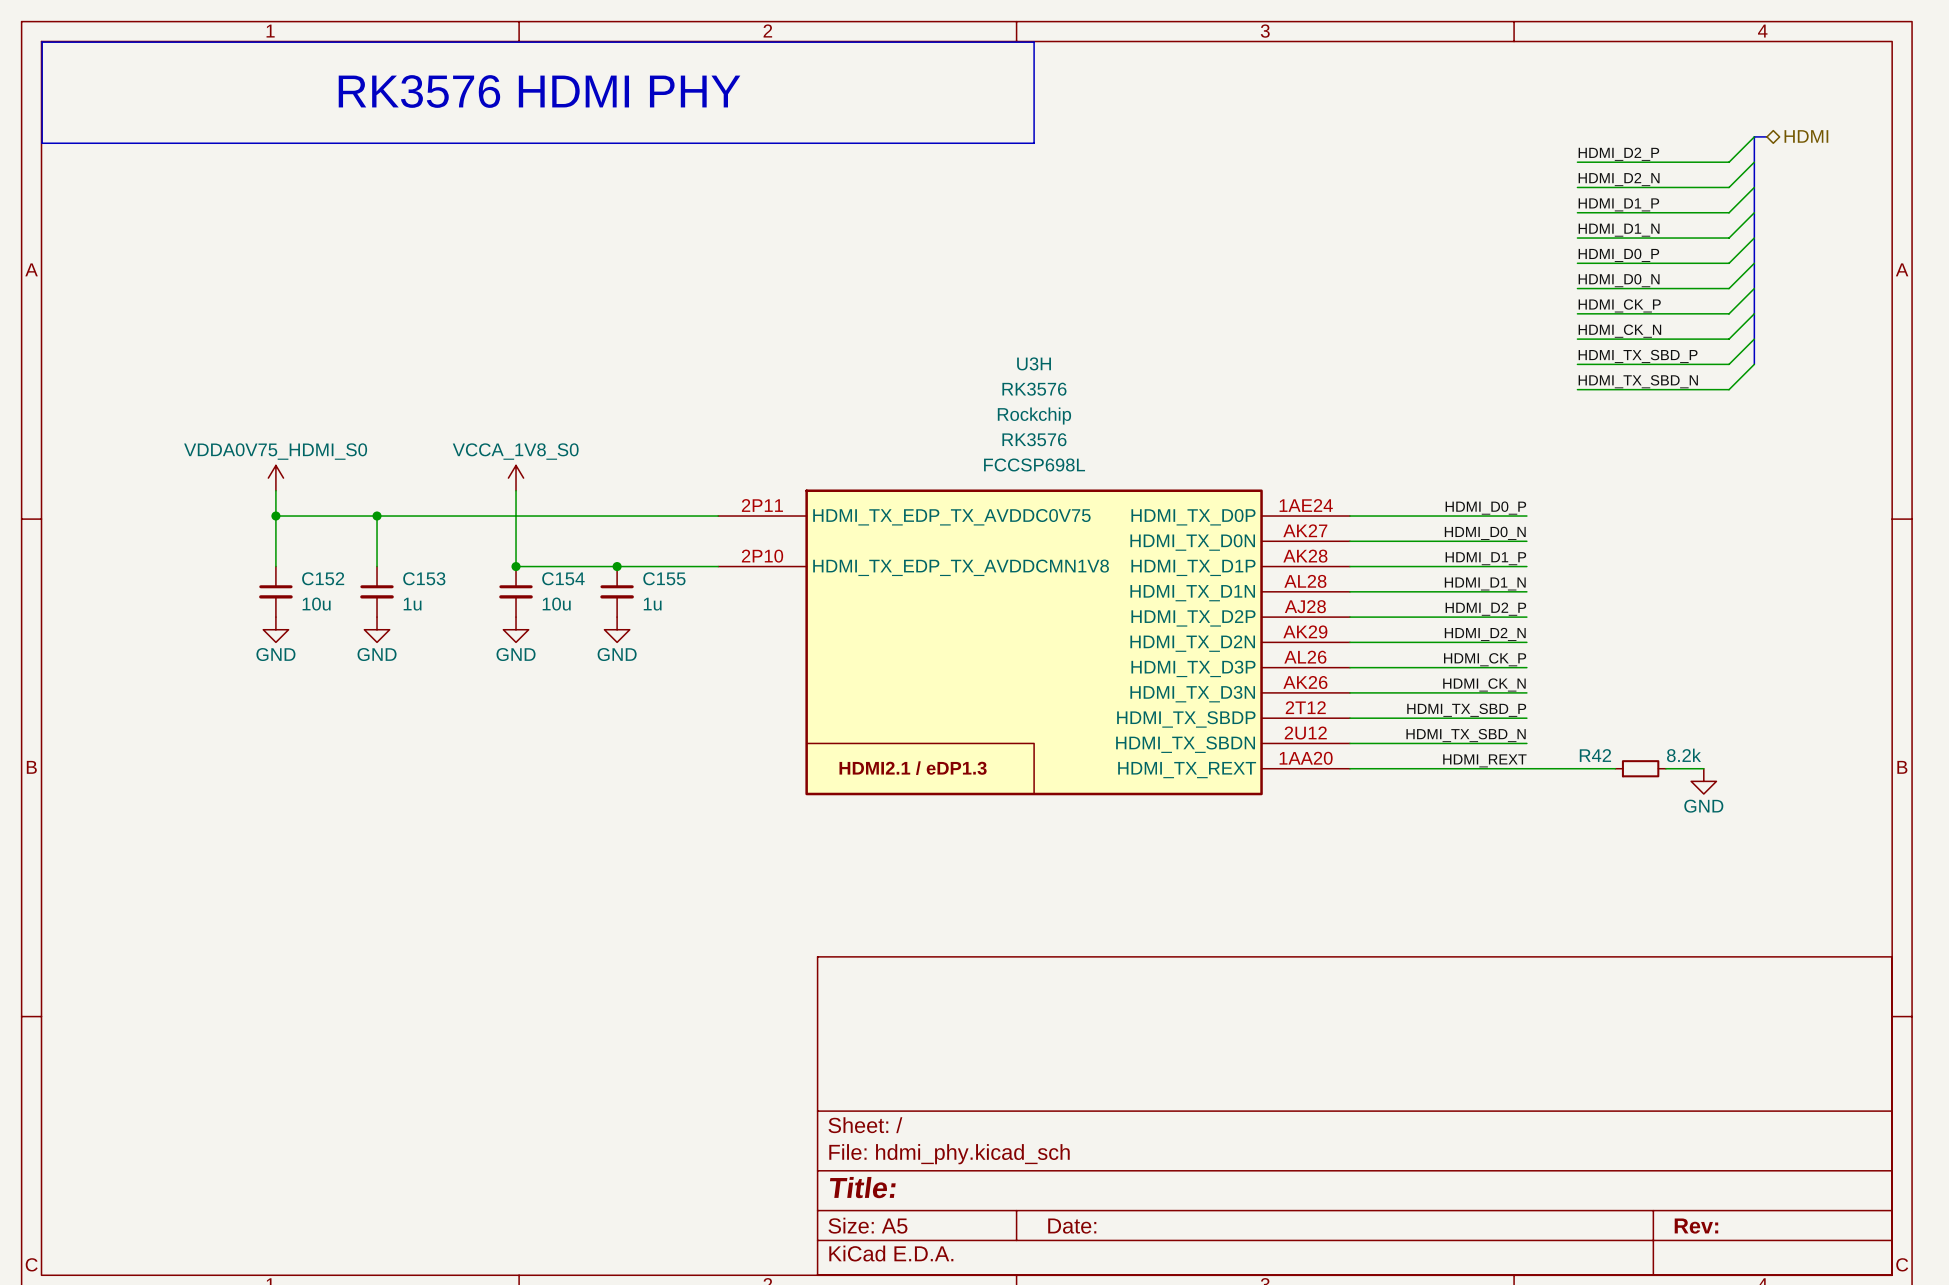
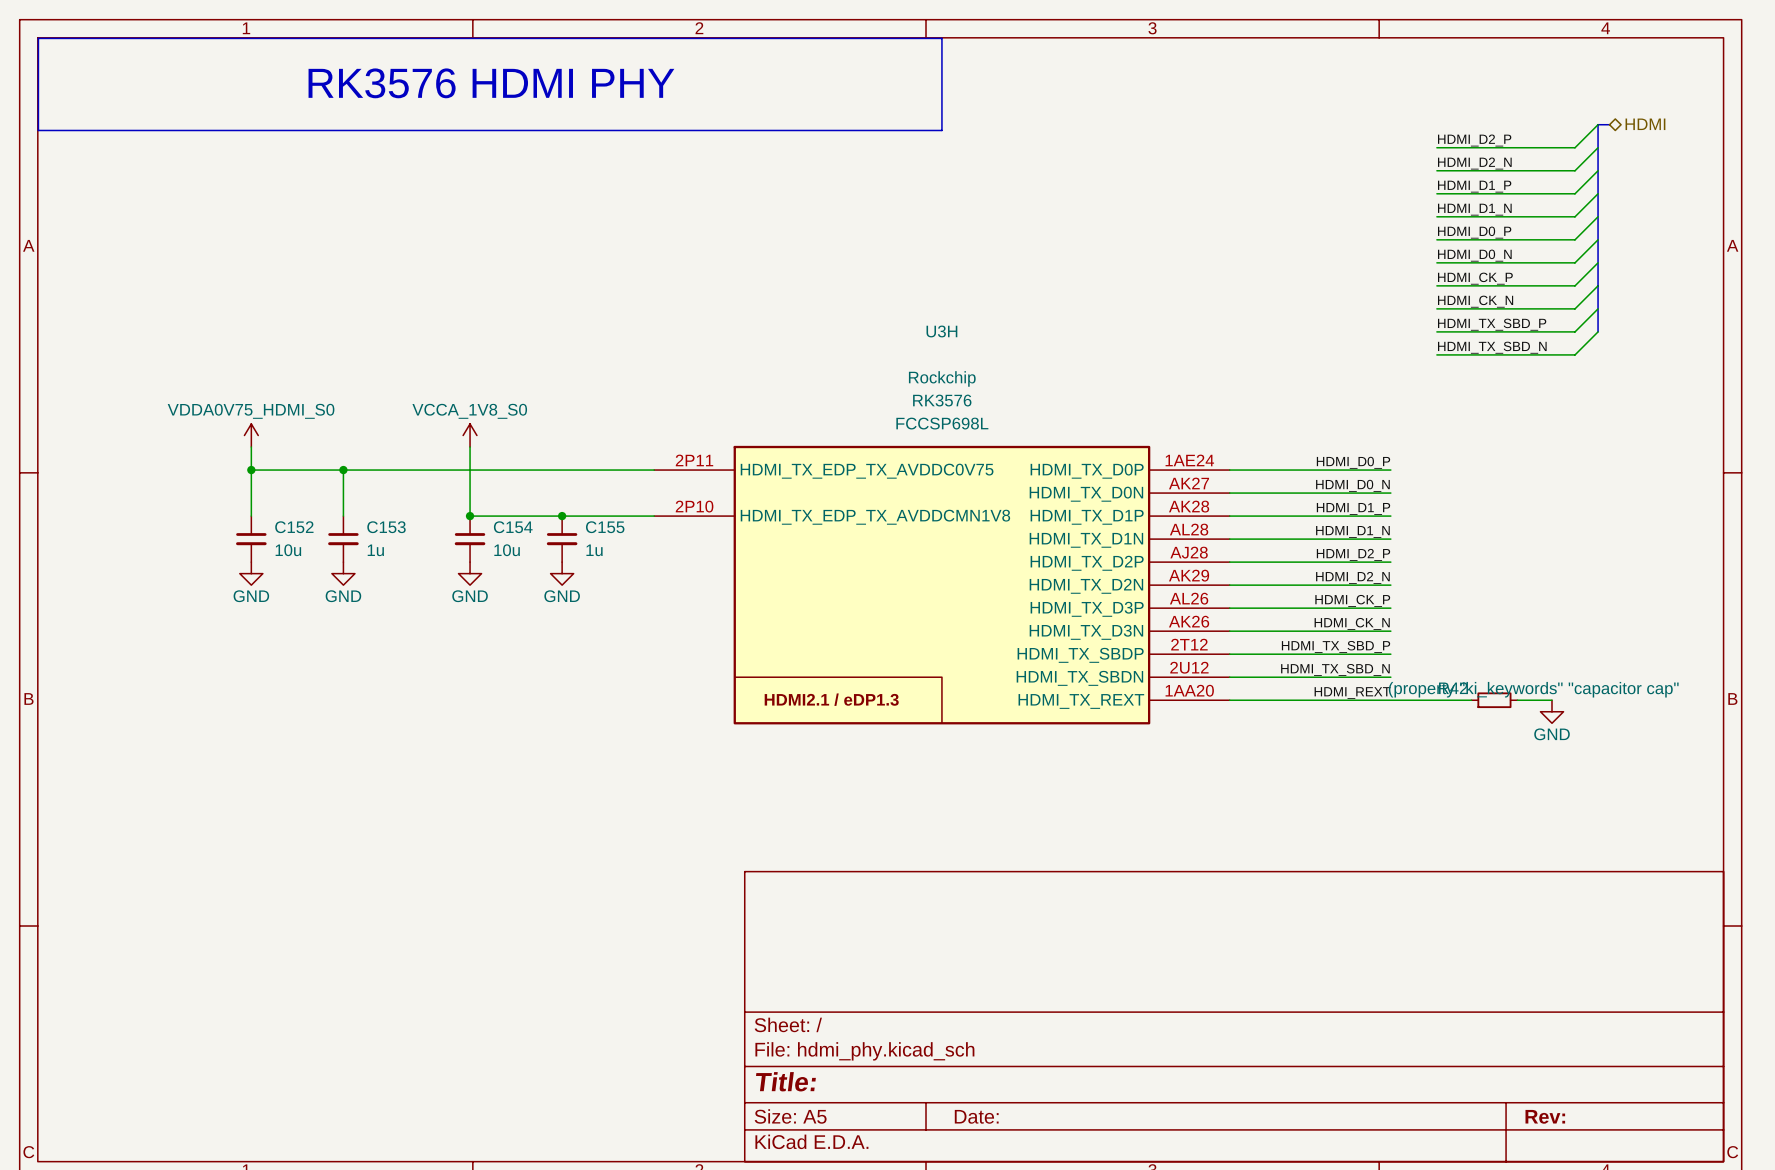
U3H value: RK3576 (1034, 389) -> none
R42 value: 8.2k (1684, 755) -> (property "ki_keywords" "capacitor cap" (1533, 689)

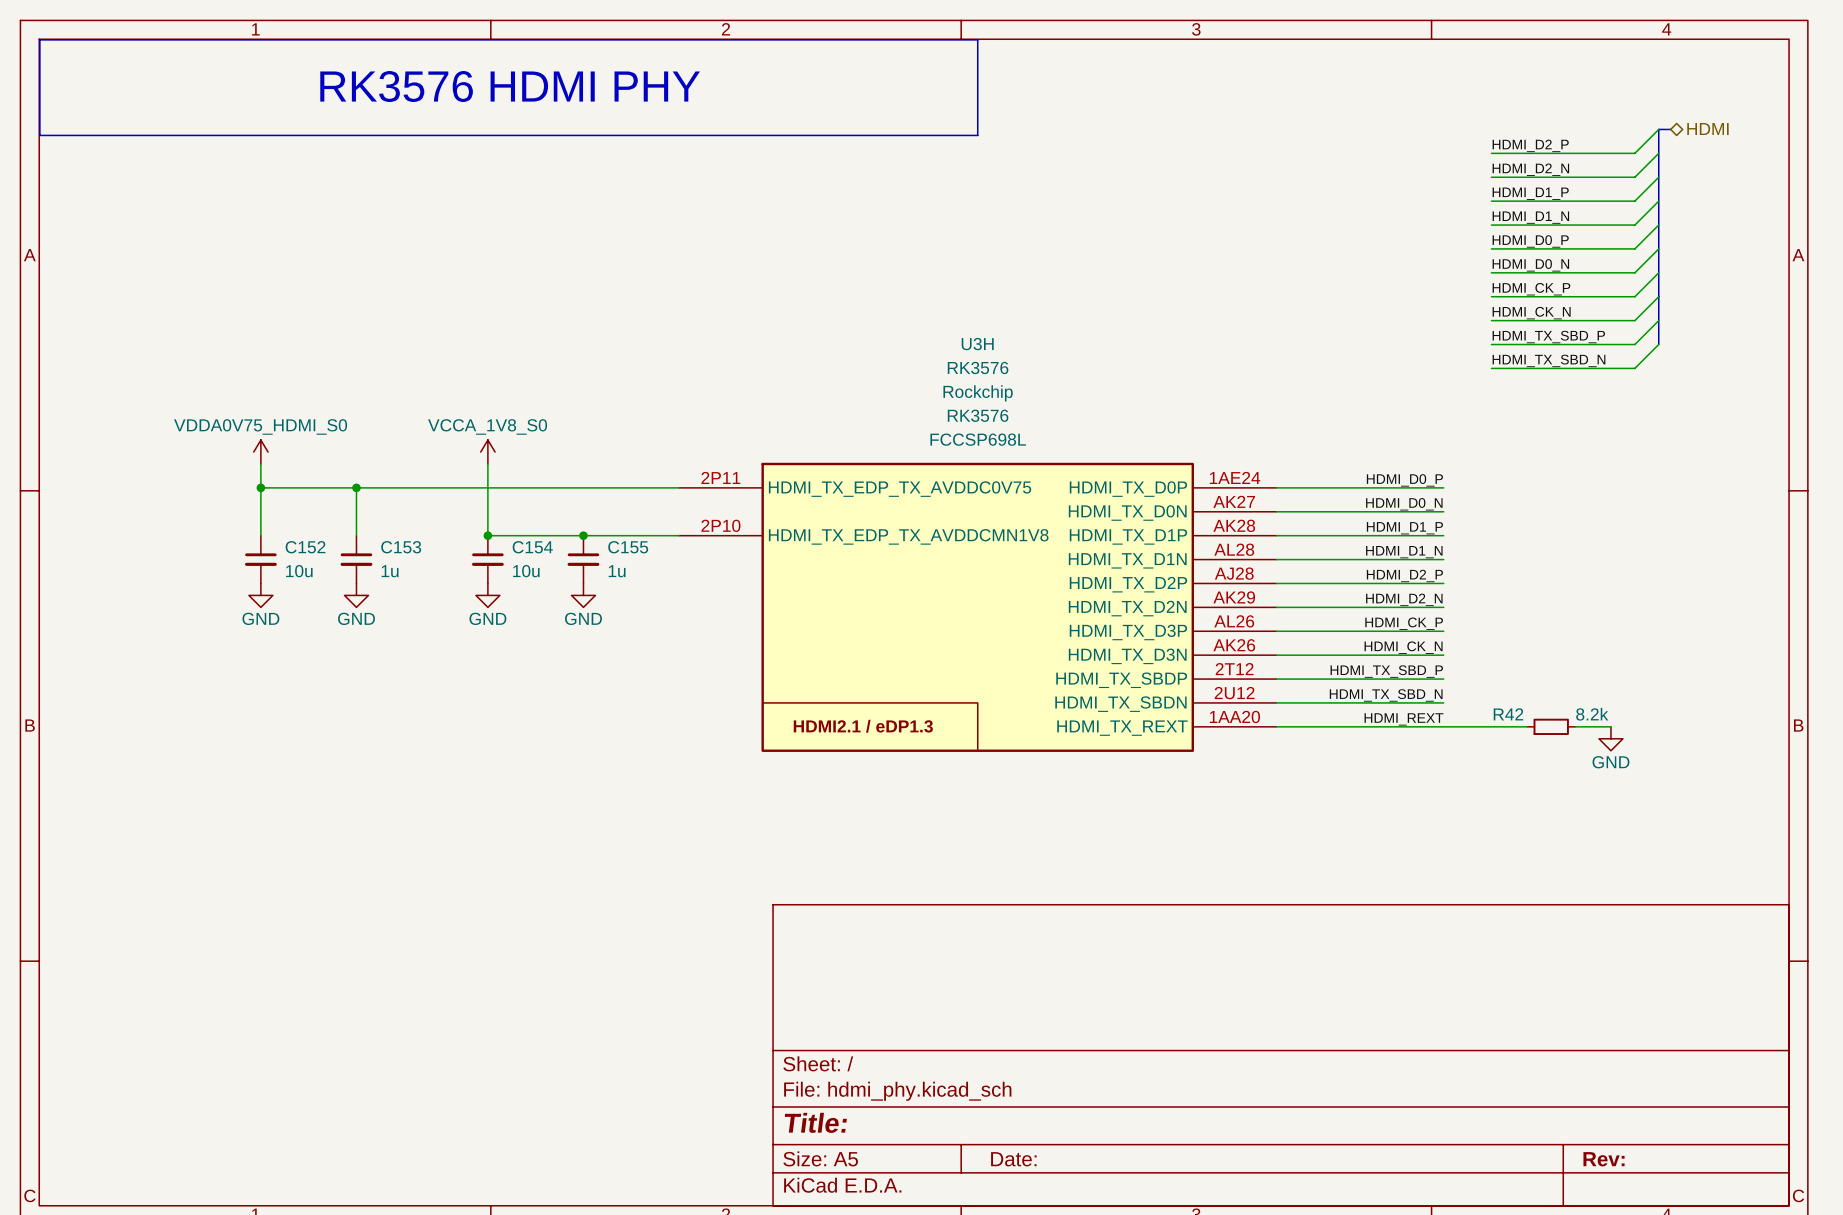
U3H value: none -> RK3576 (978, 367)
R42 value: (property "ki_keywords" "capacitor cap" (1533, 689) -> 8.2k (1592, 714)

